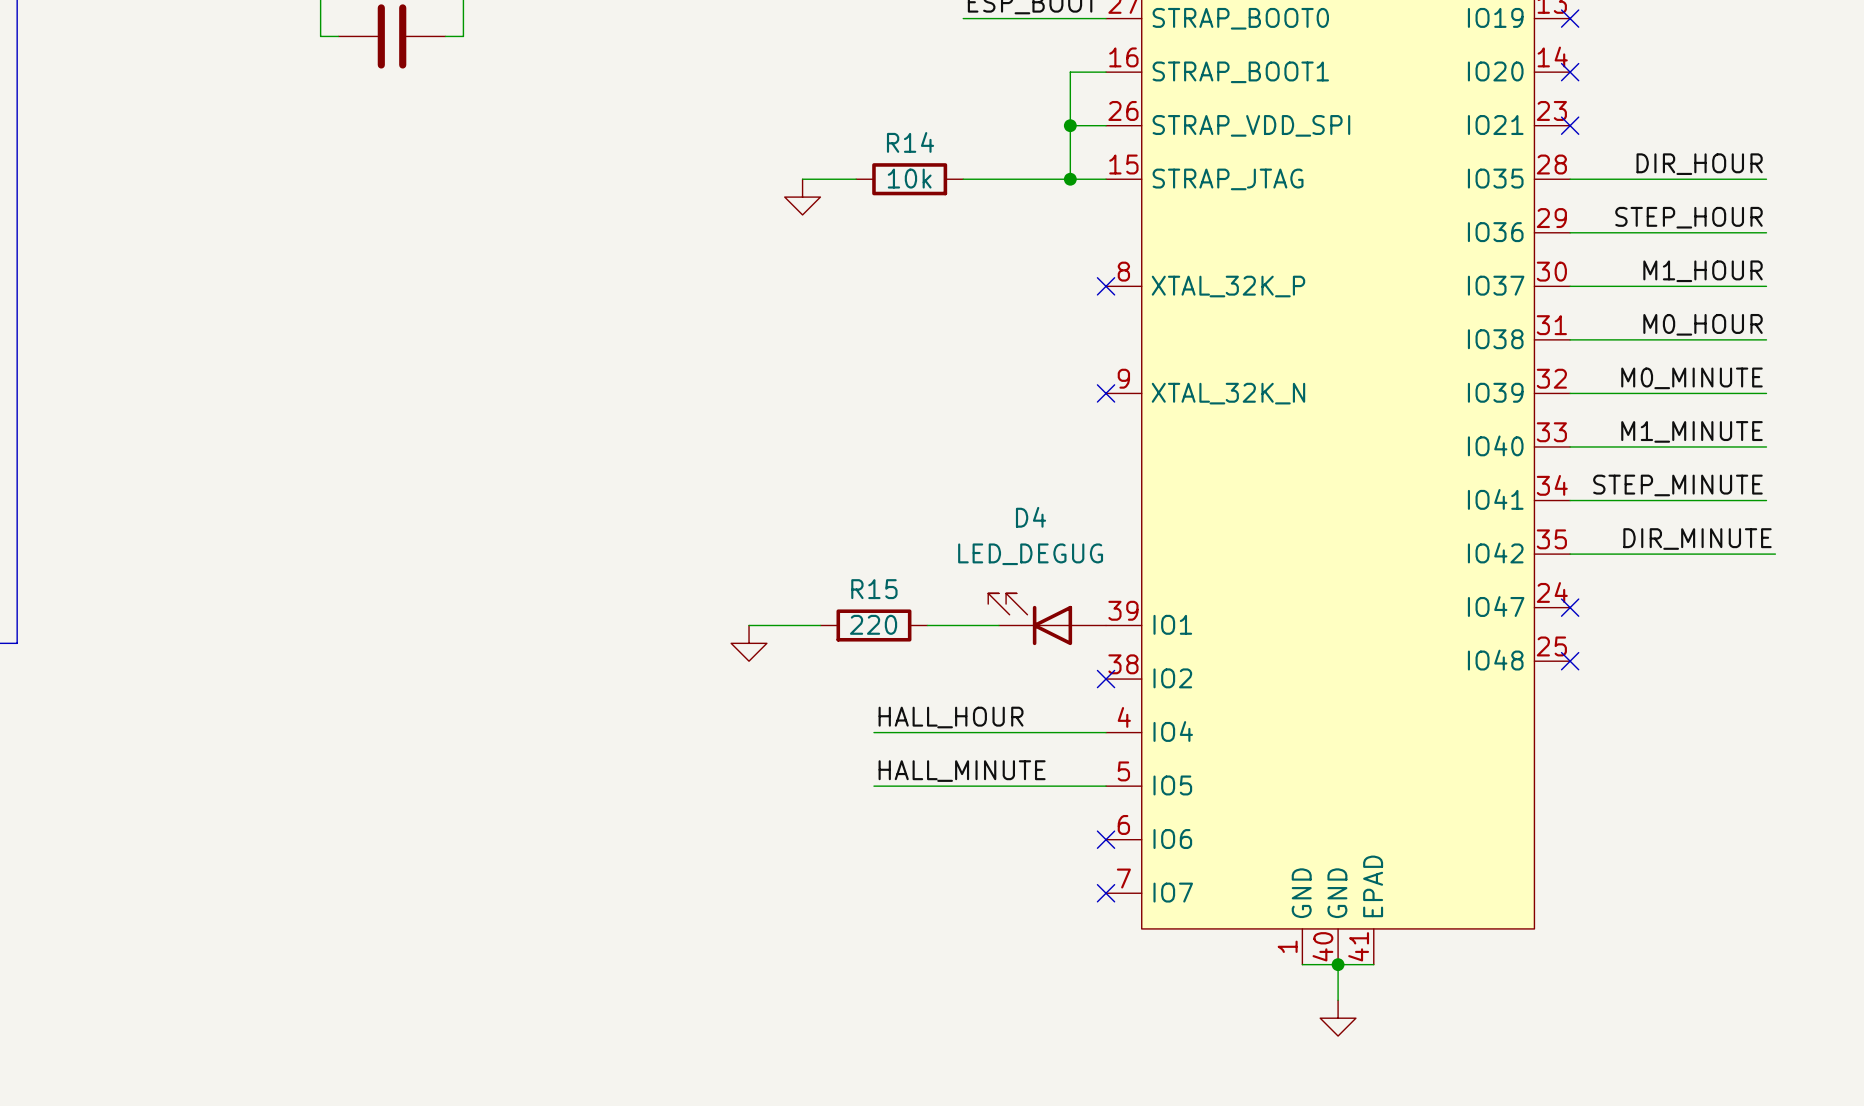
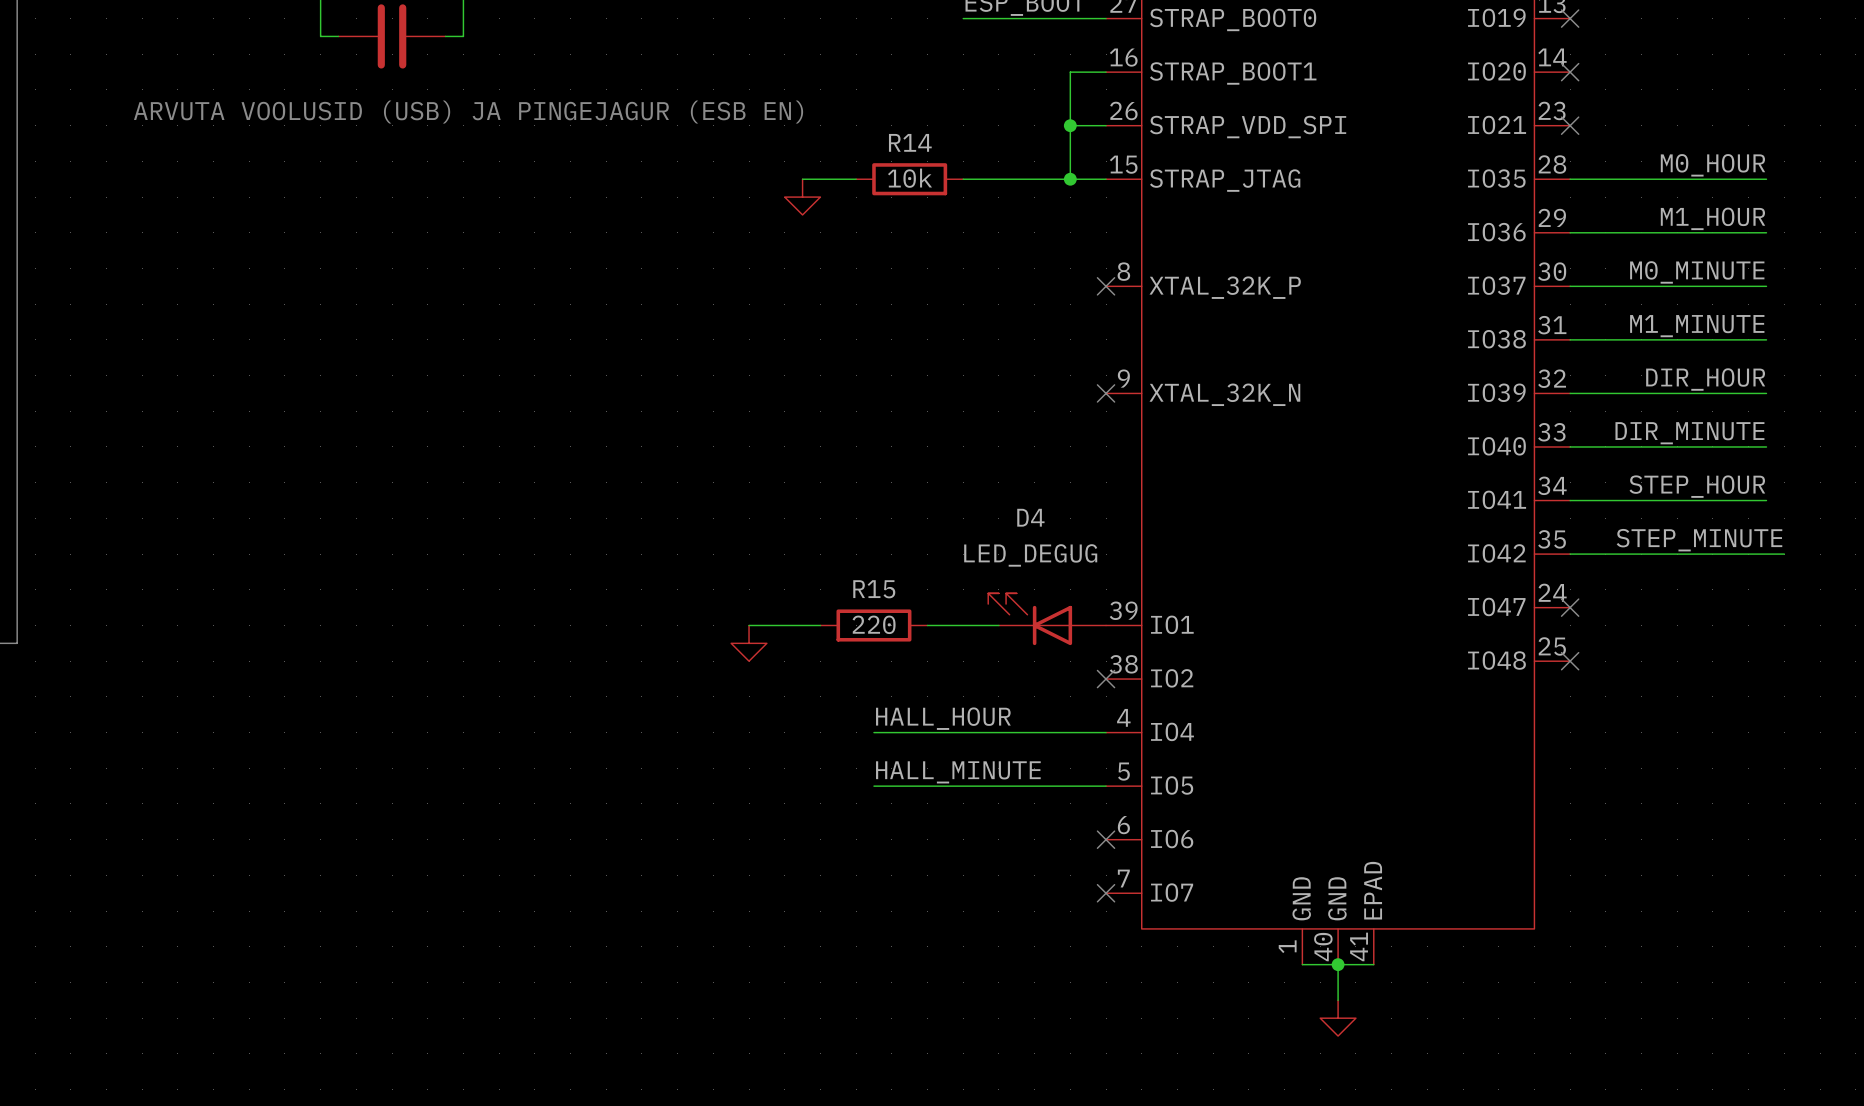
text: none -> ARVUTA VOOLUSID (USB) JA PINGEJAGUR (ESB EN) (468, 112)
label: DIR_HOUR (1699, 164) -> M0_HOUR (1712, 165)
label: STEP_HOUR (1689, 217) -> M1_HOUR (1712, 218)
label: M1_HOUR (1703, 271) -> M0_MINUTE (1697, 272)
label: M0_HOUR (1703, 324) -> M1_MINUTE (1697, 326)
label: M0_MINUTE (1691, 378) -> DIR_HOUR (1705, 379)
label: M1_MINUTE (1691, 431) -> DIR_MINUTE (1689, 433)
label: STEP_MINUTE (1677, 485) -> STEP_HOUR (1697, 486)
label: DIR_MINUTE (1697, 539) -> STEP_MINUTE (1699, 540)
wire: none -> (1775, 554) (1784, 554)

